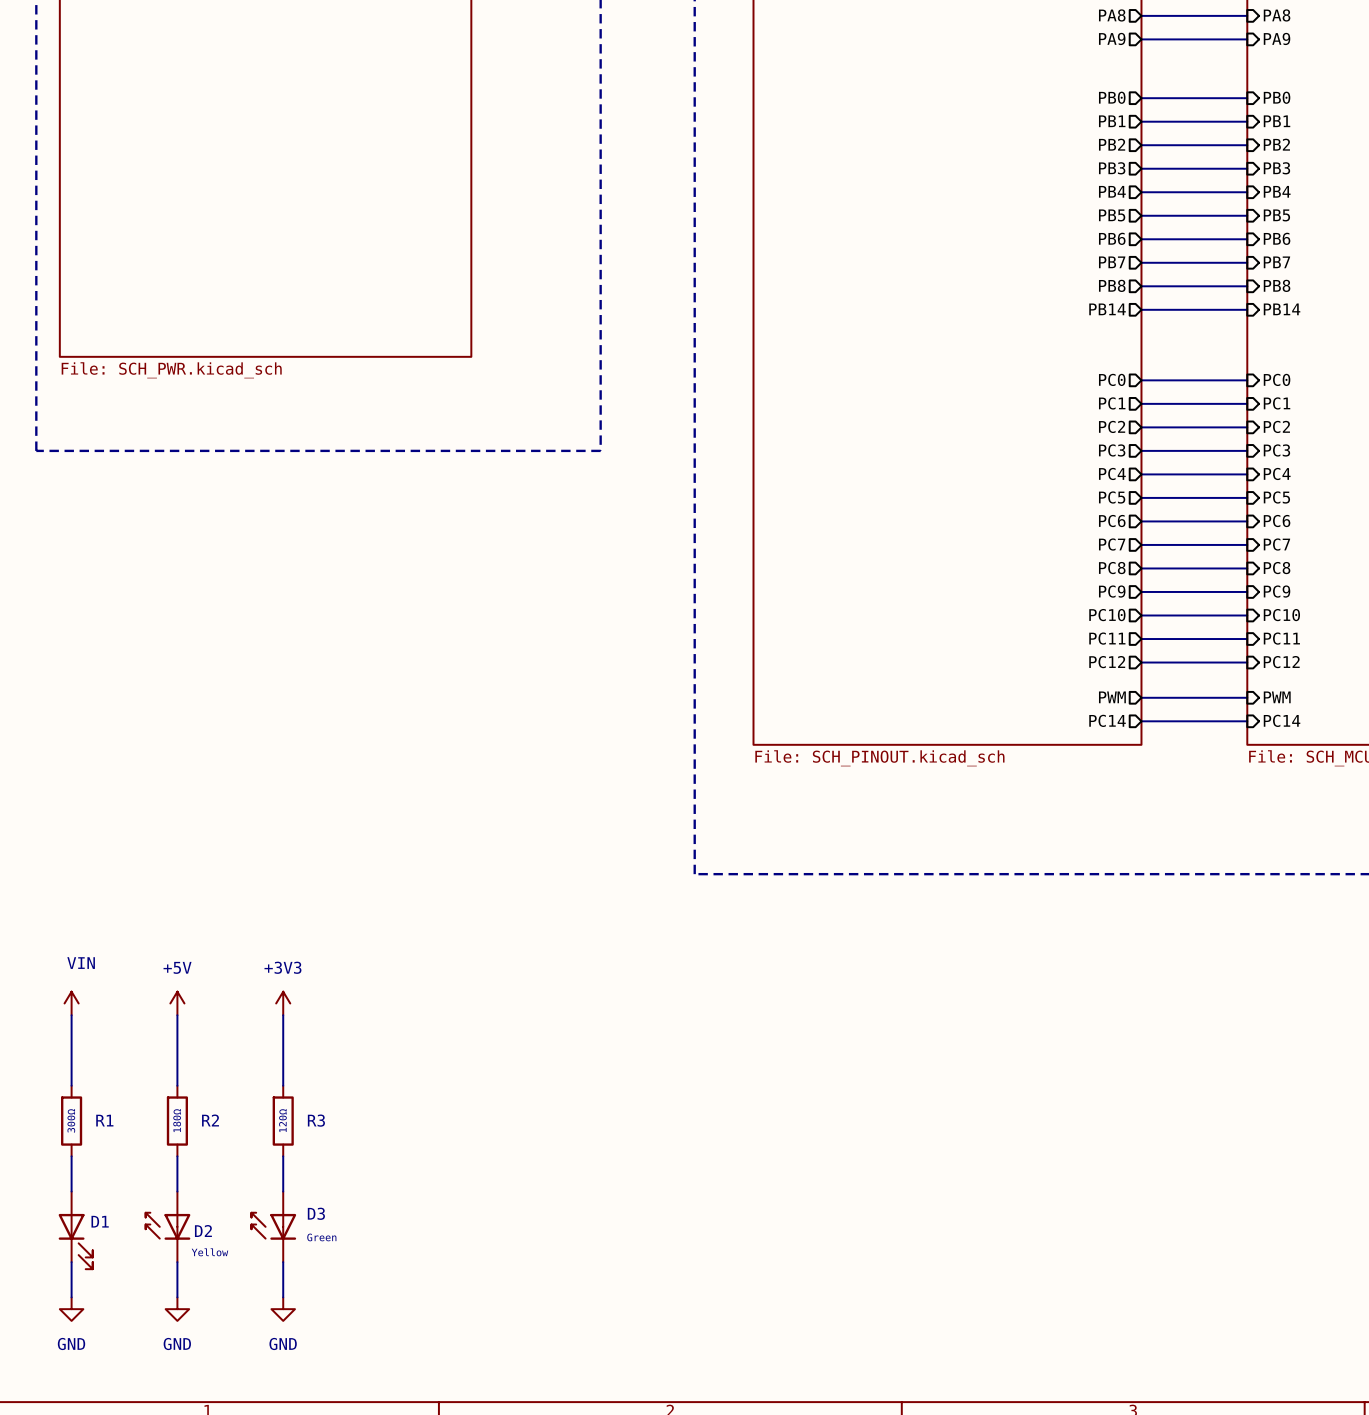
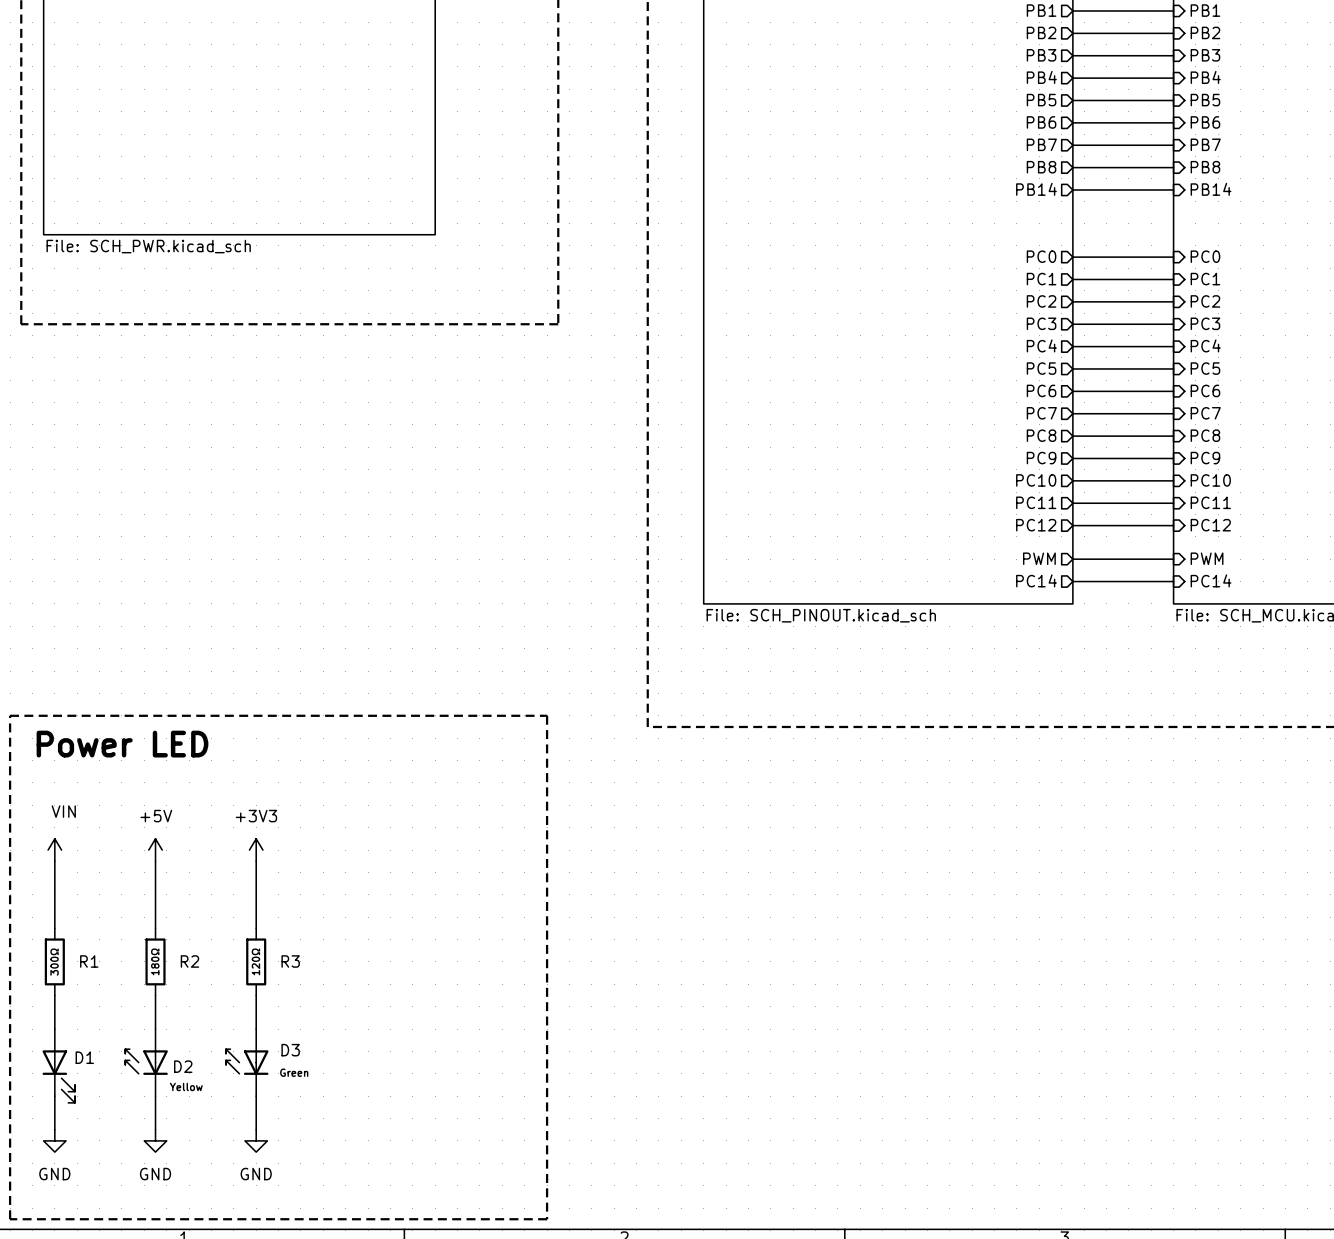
line: none -> (10, 715) (547, 715) (547, 1219) (10, 1219) (10, 715)
text: none -> Power LED (122, 744)

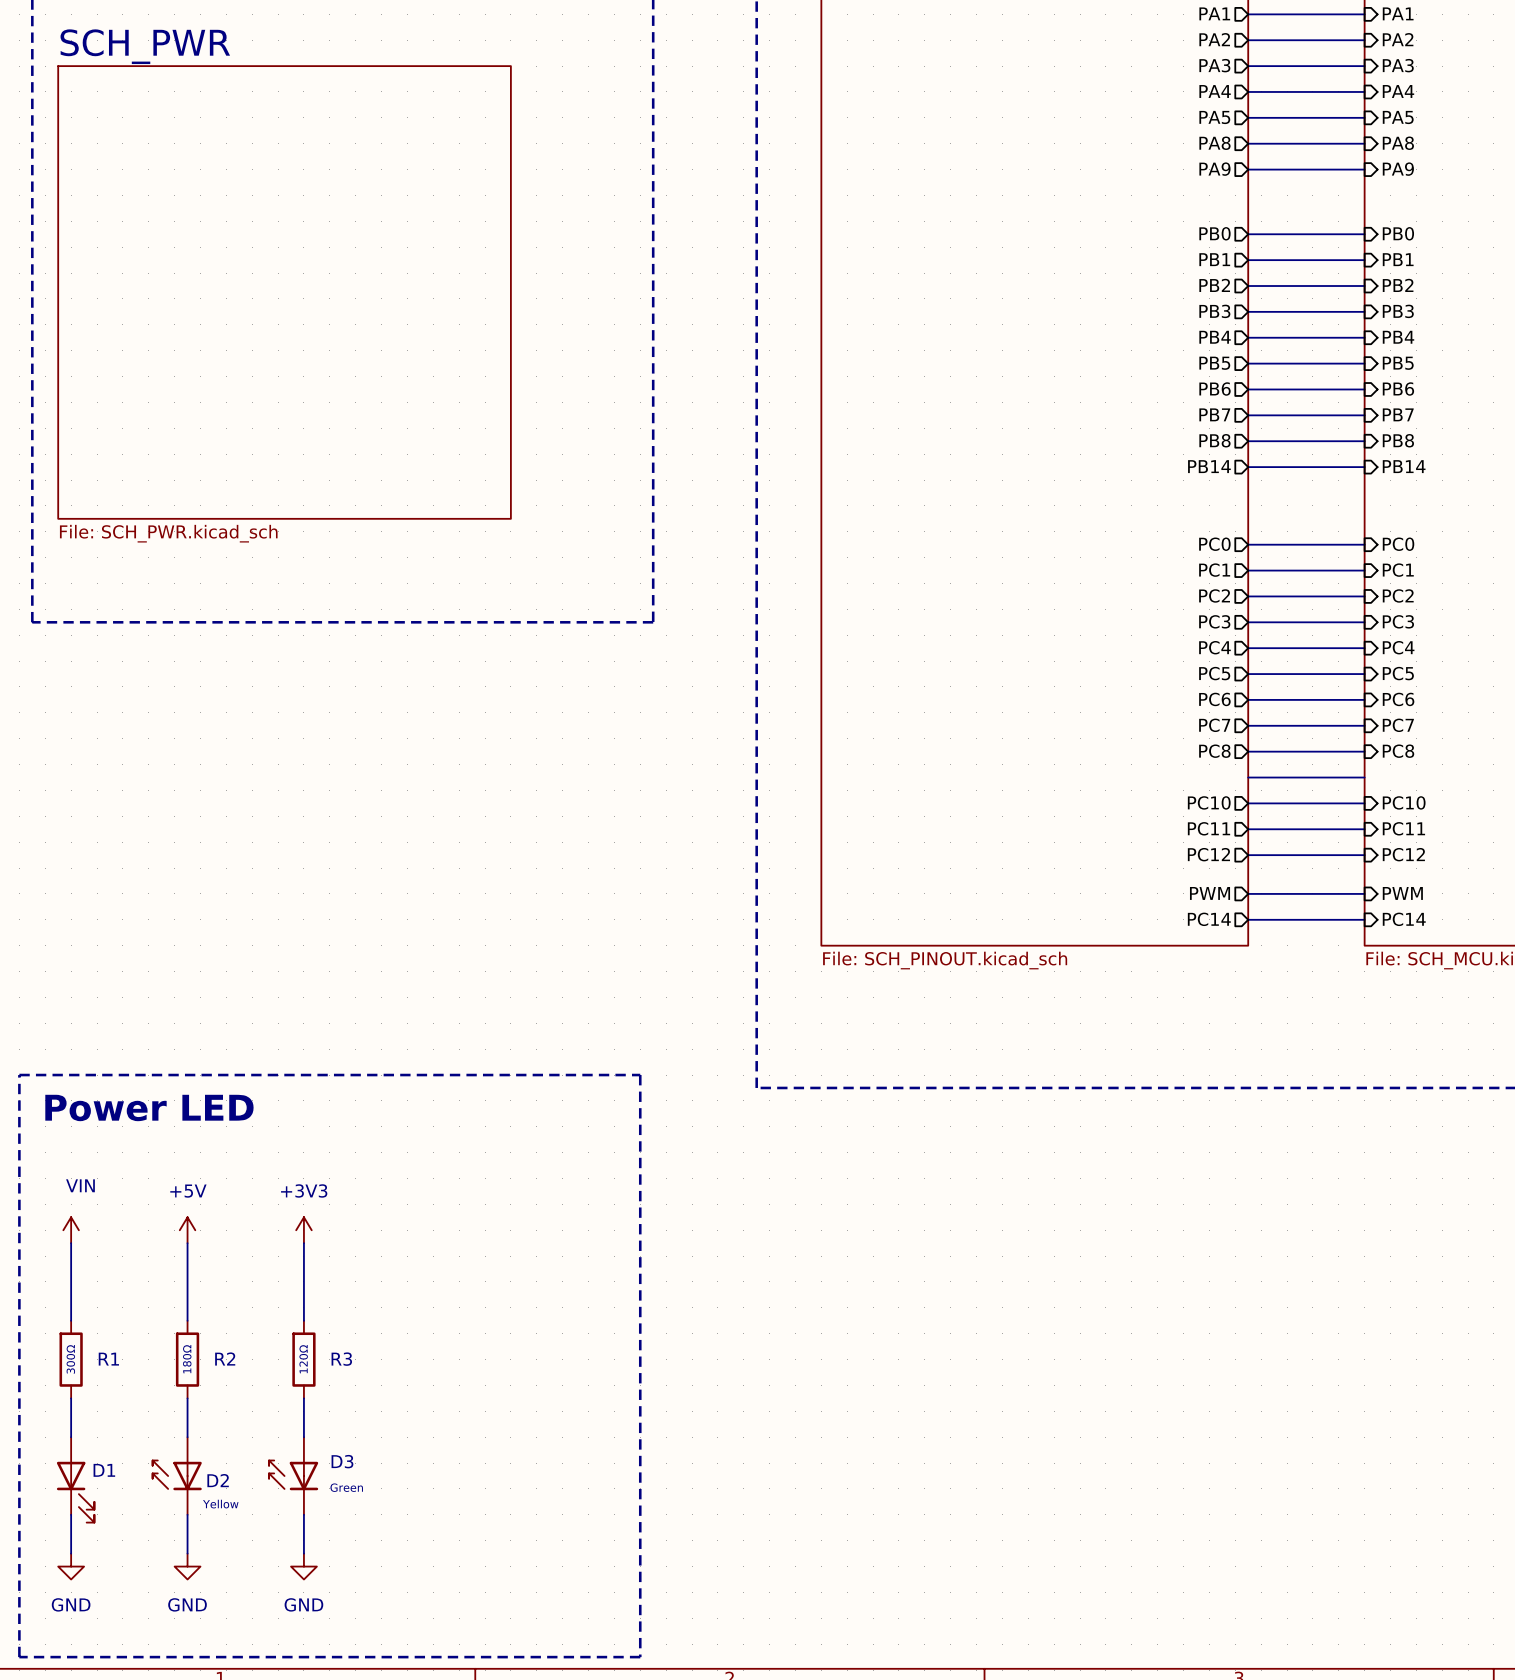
sheet pin: PC9 (1041, 458) -> none
sheet pin: PC9 (1205, 458) -> none

